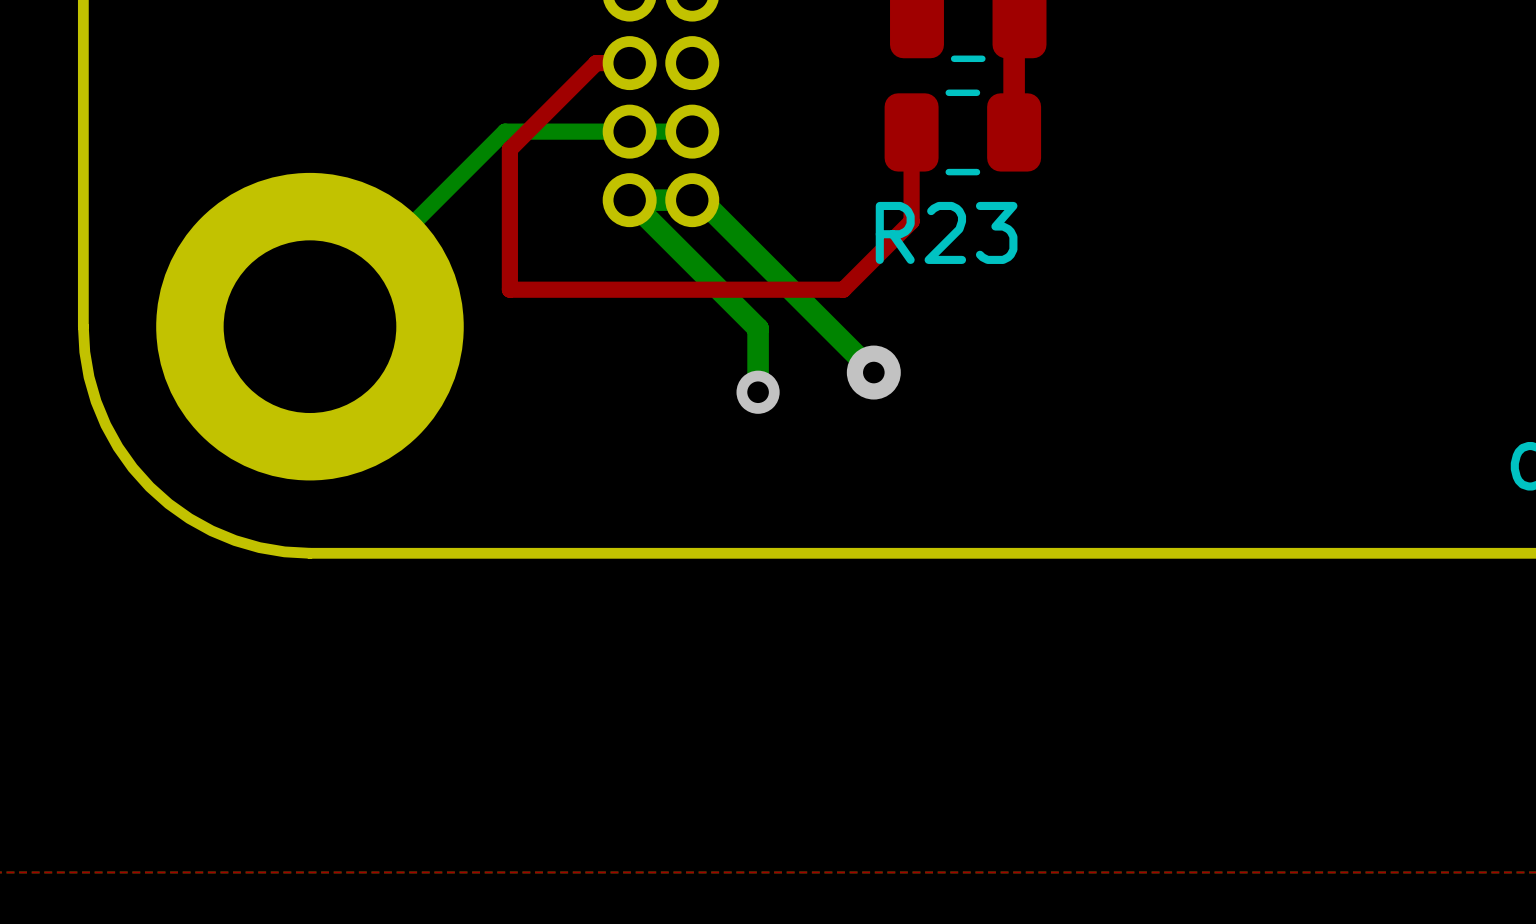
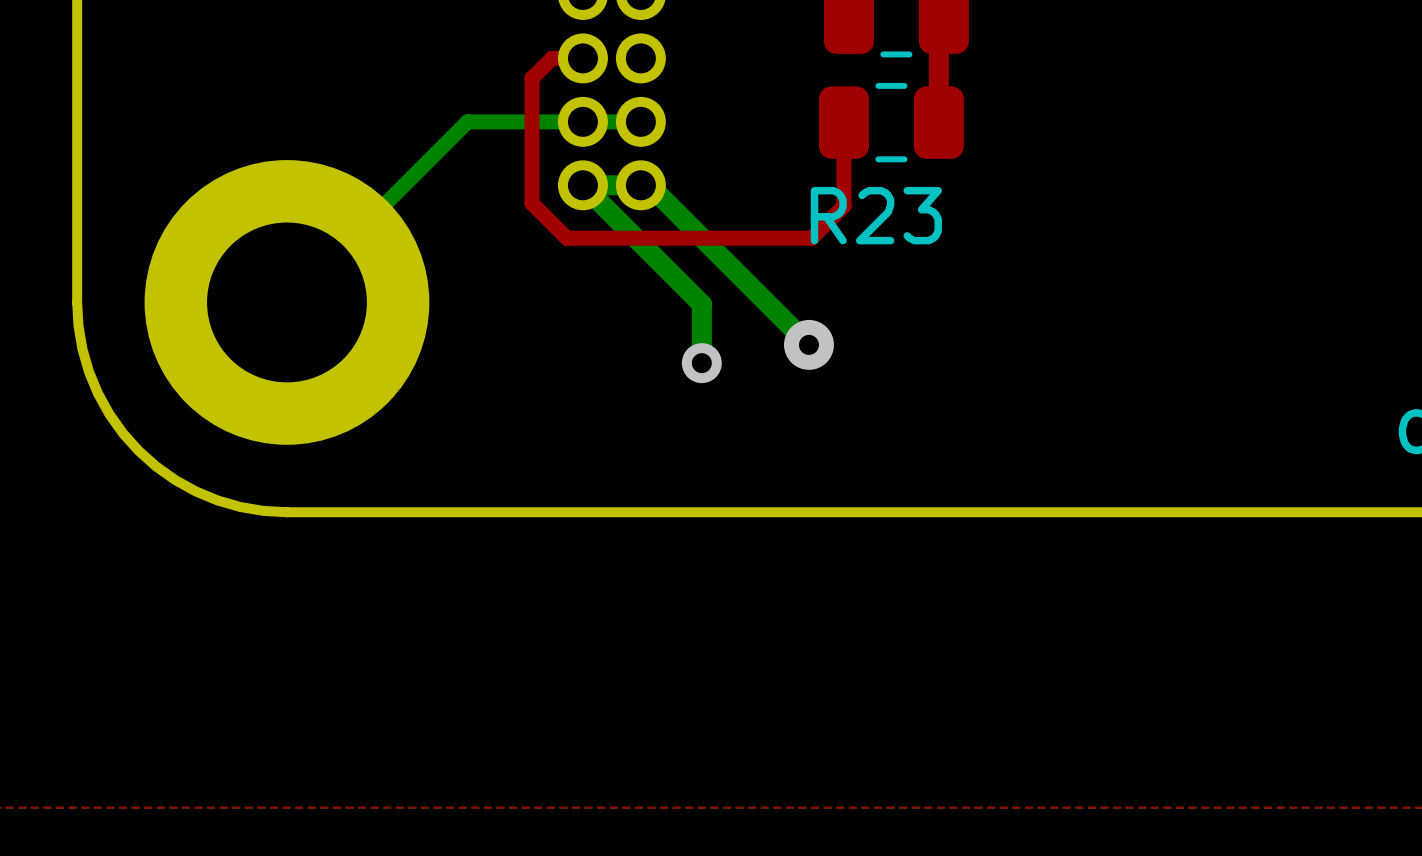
top track: (574, 84) (509, 149) (509, 289) (843, 289) (911, 221) -> (531, 78) (531, 203) (566, 238) (811, 238) (843, 206)

